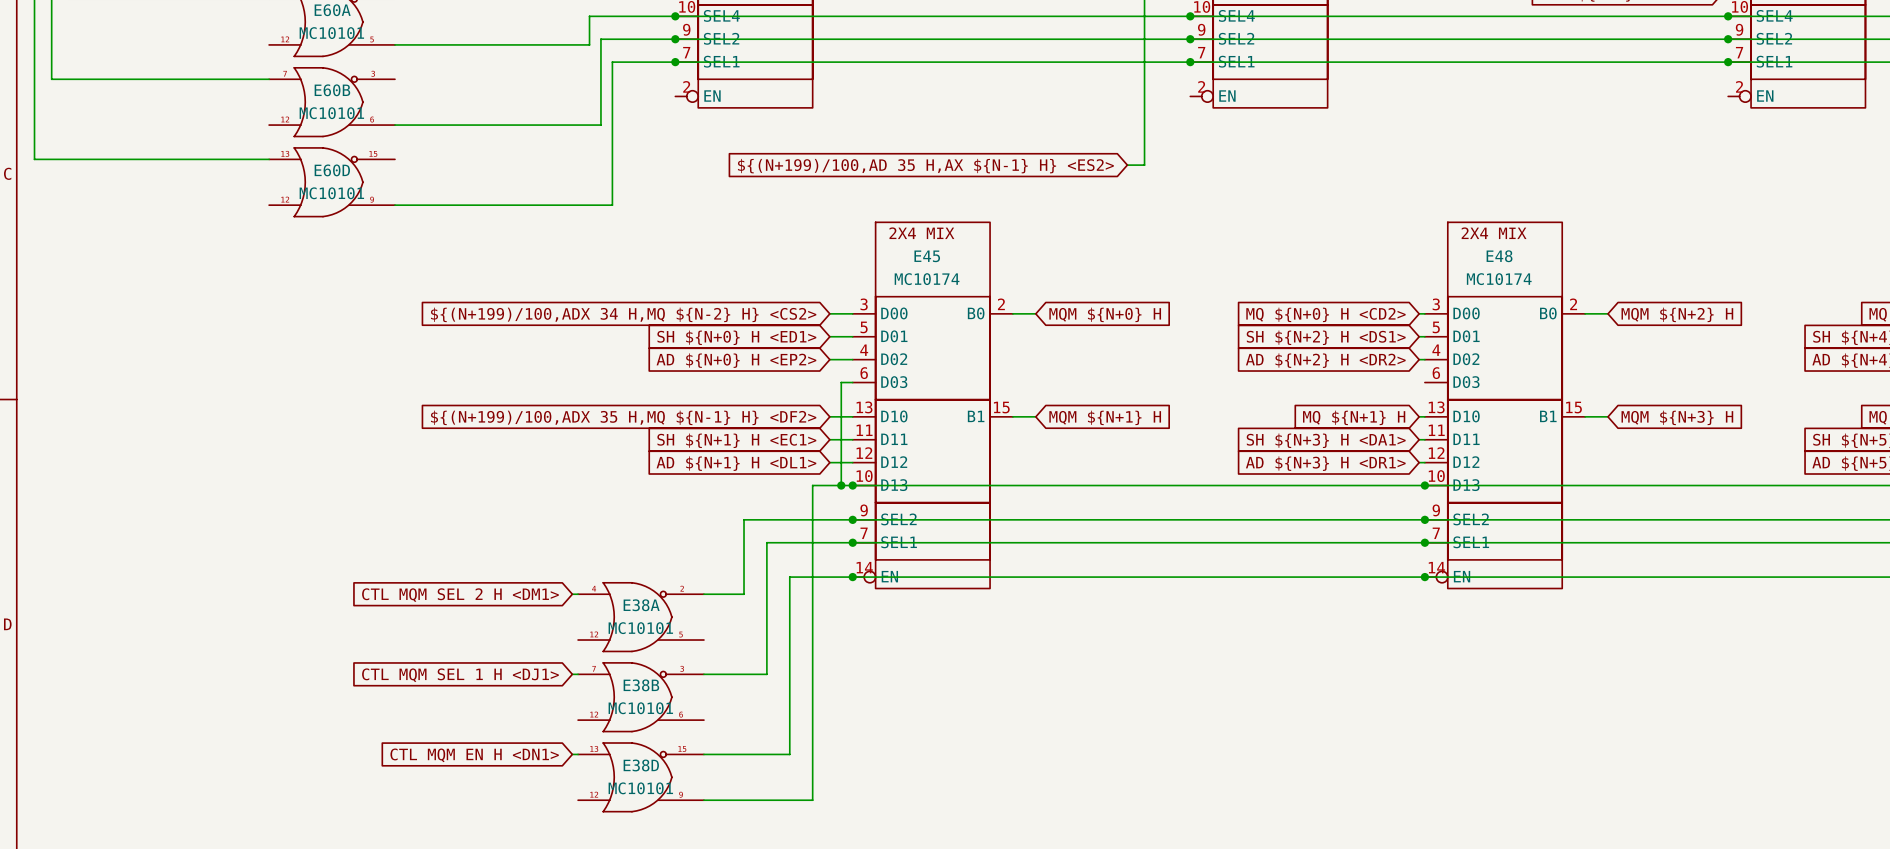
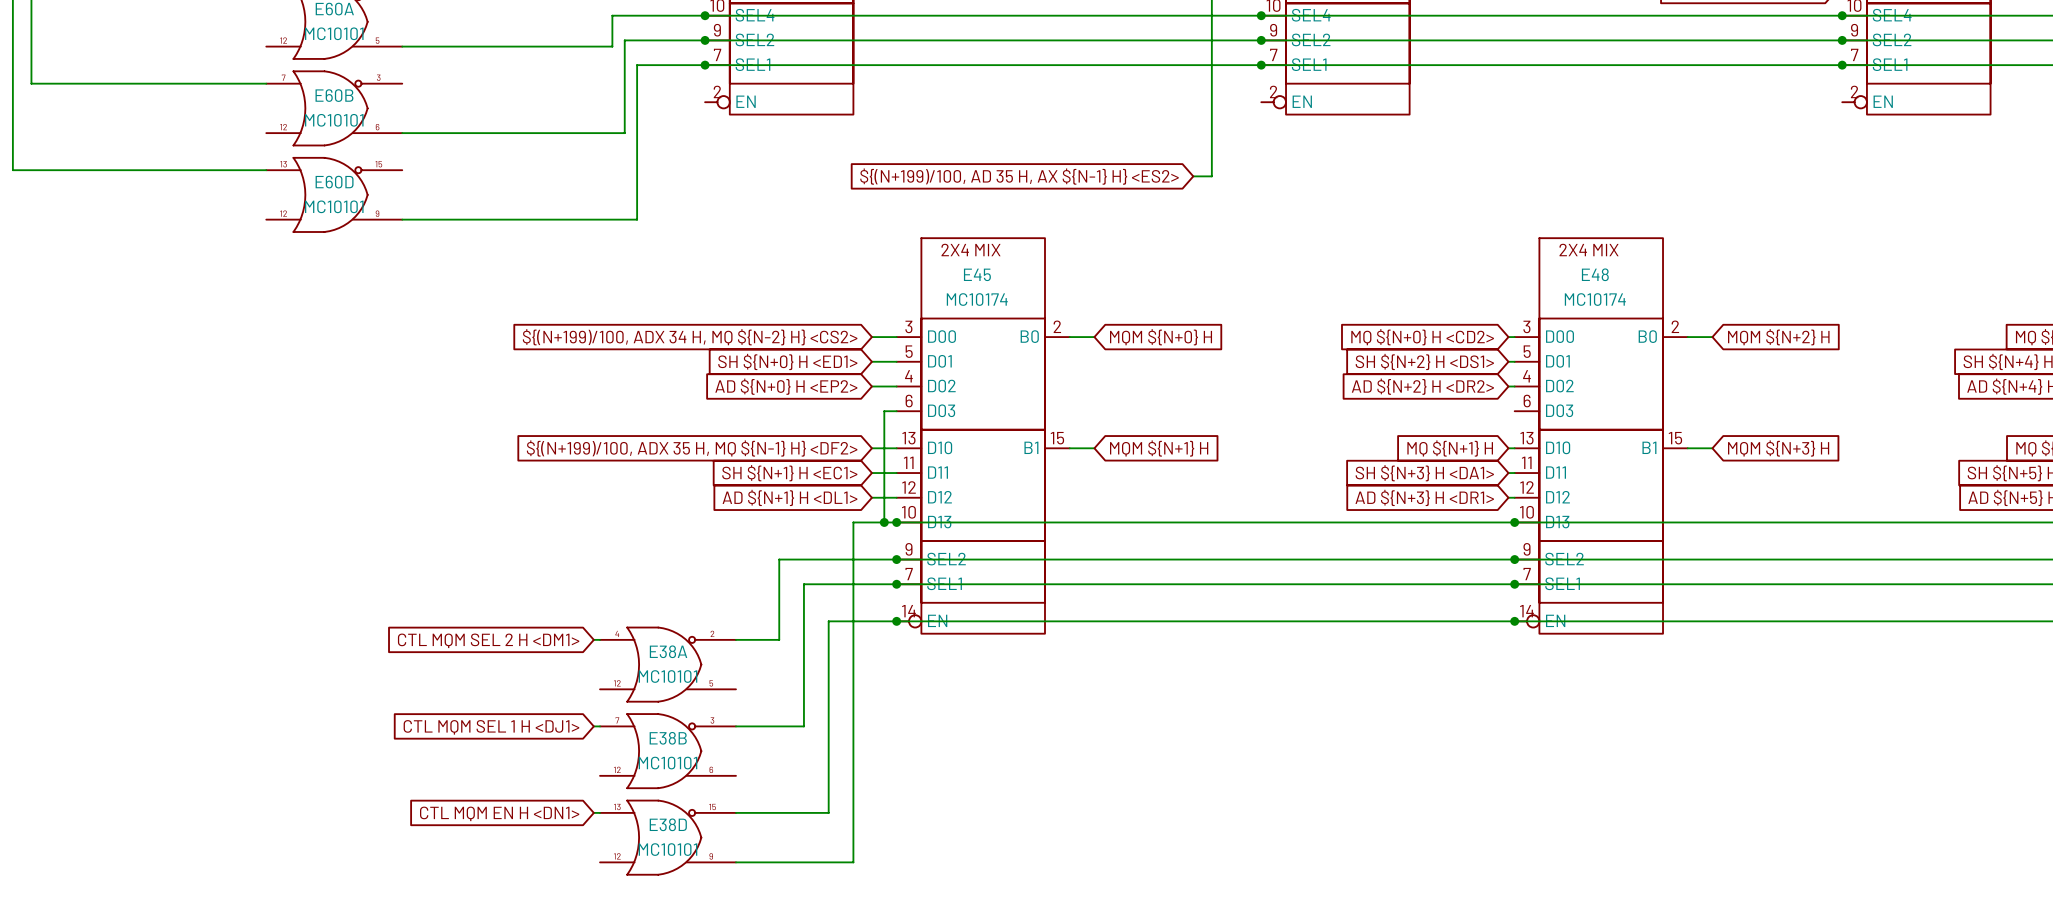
global label: ${(N+199)/100,AD 35 H,AX ${N-1} H} <ES2> (925, 166) -> ${(N+199)/100, AD 35 H, AX ${N-1} H} <ES2> (1019, 176)
global label: ${(N+199)/100,ADX 34 H,MQ ${N-2} H} <CS2> (623, 314) -> ${(N+199)/100, ADX 34 H, MQ ${N-2} H} <CS2> (690, 337)
global label: ${(N+199)/100,ADX 35 H,MQ ${N-1} H} <DF2> (623, 417) -> ${(N+199)/100, ADX 35 H, MQ ${N-1} H} <DF2> (692, 448)

